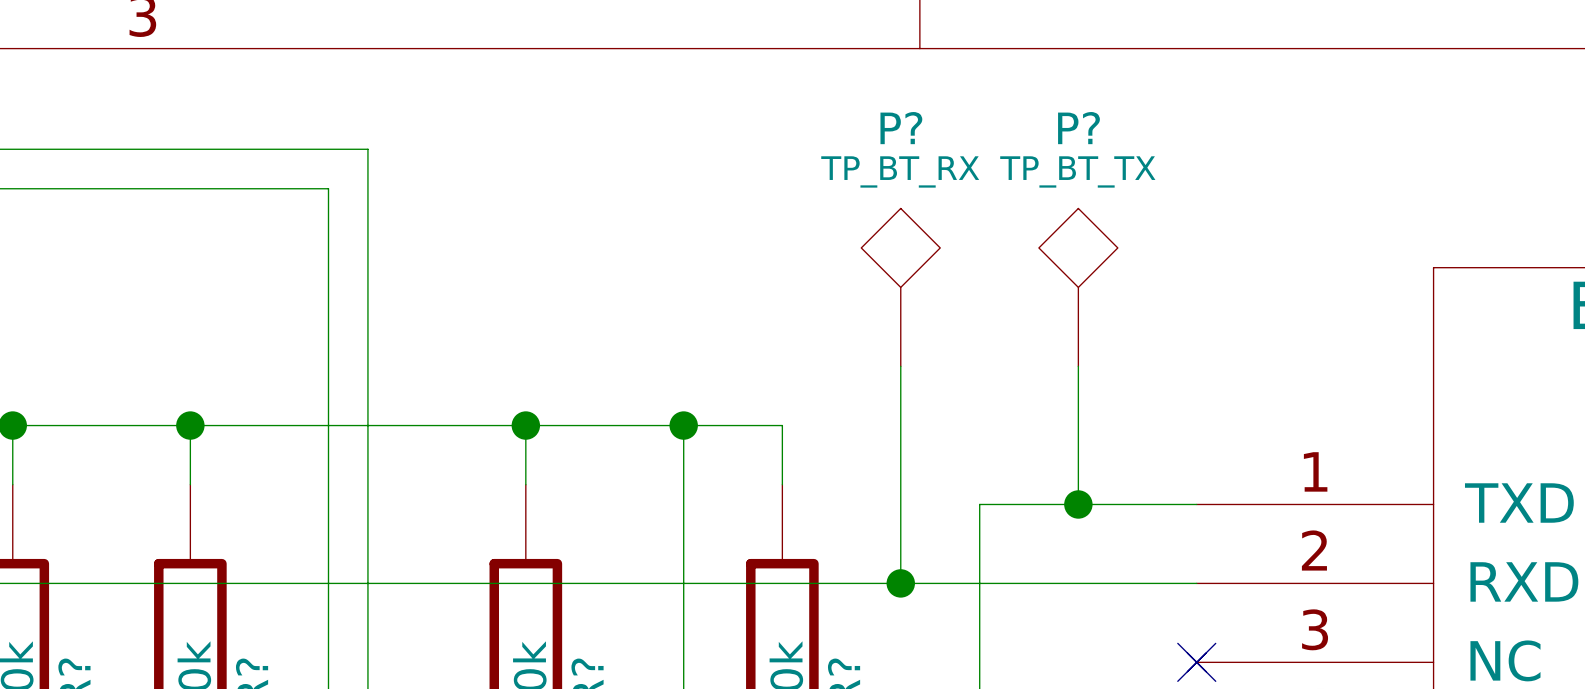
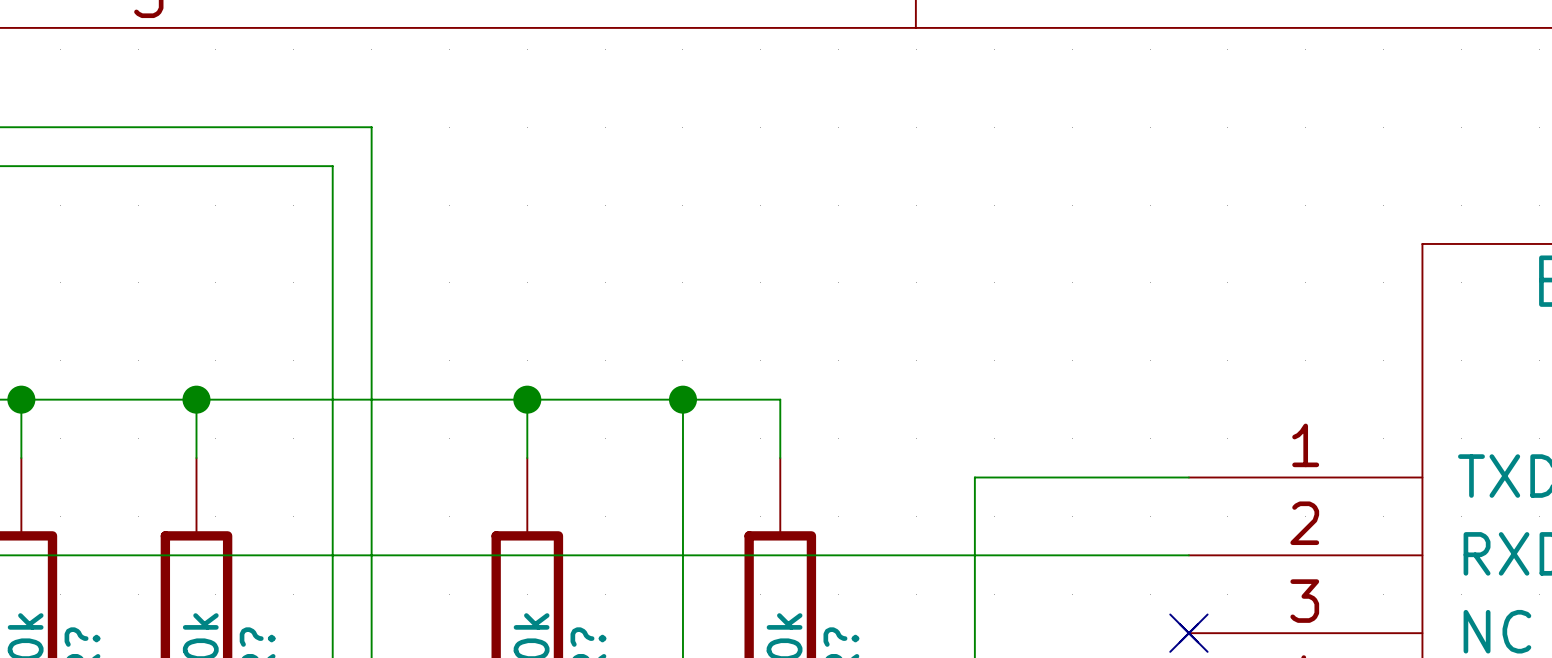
P?: TP_BT_RX (900, 287) -> none
P?: TP_BT_TX (1078, 287) -> none
wire: (900, 366) (900, 583) -> none
wire: (1078, 366) (1078, 504) -> none
junction: (1078, 504) -> none
junction: (900, 583) -> none

